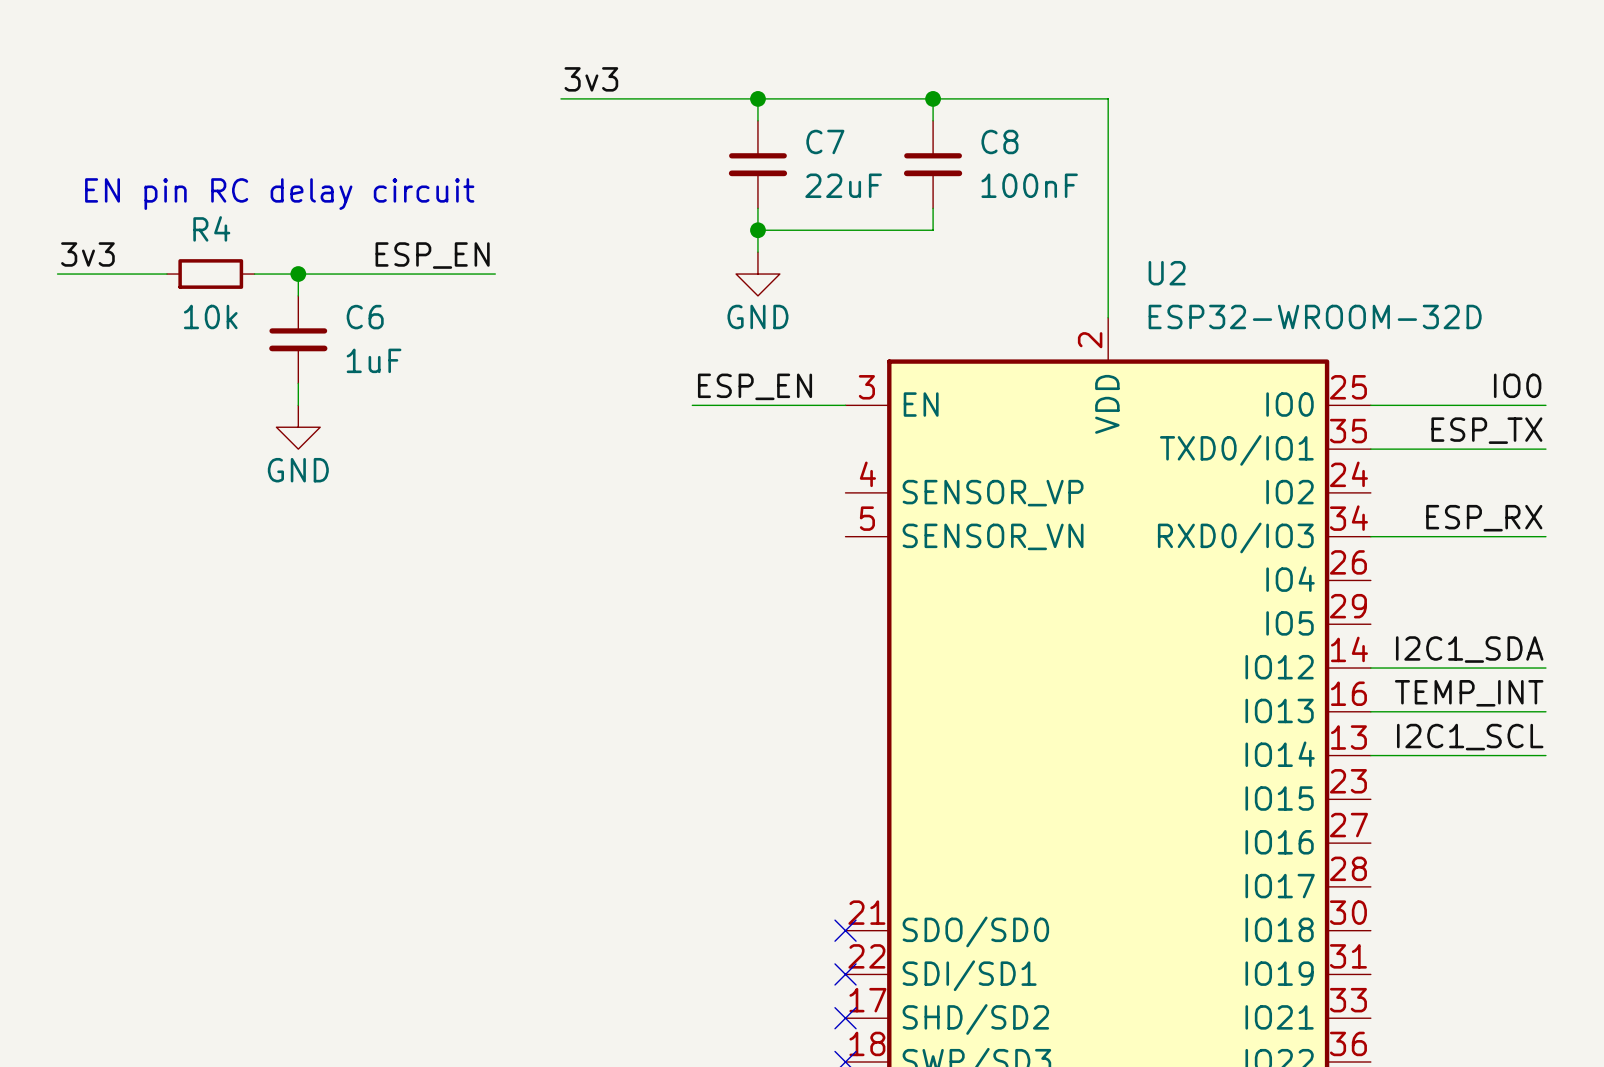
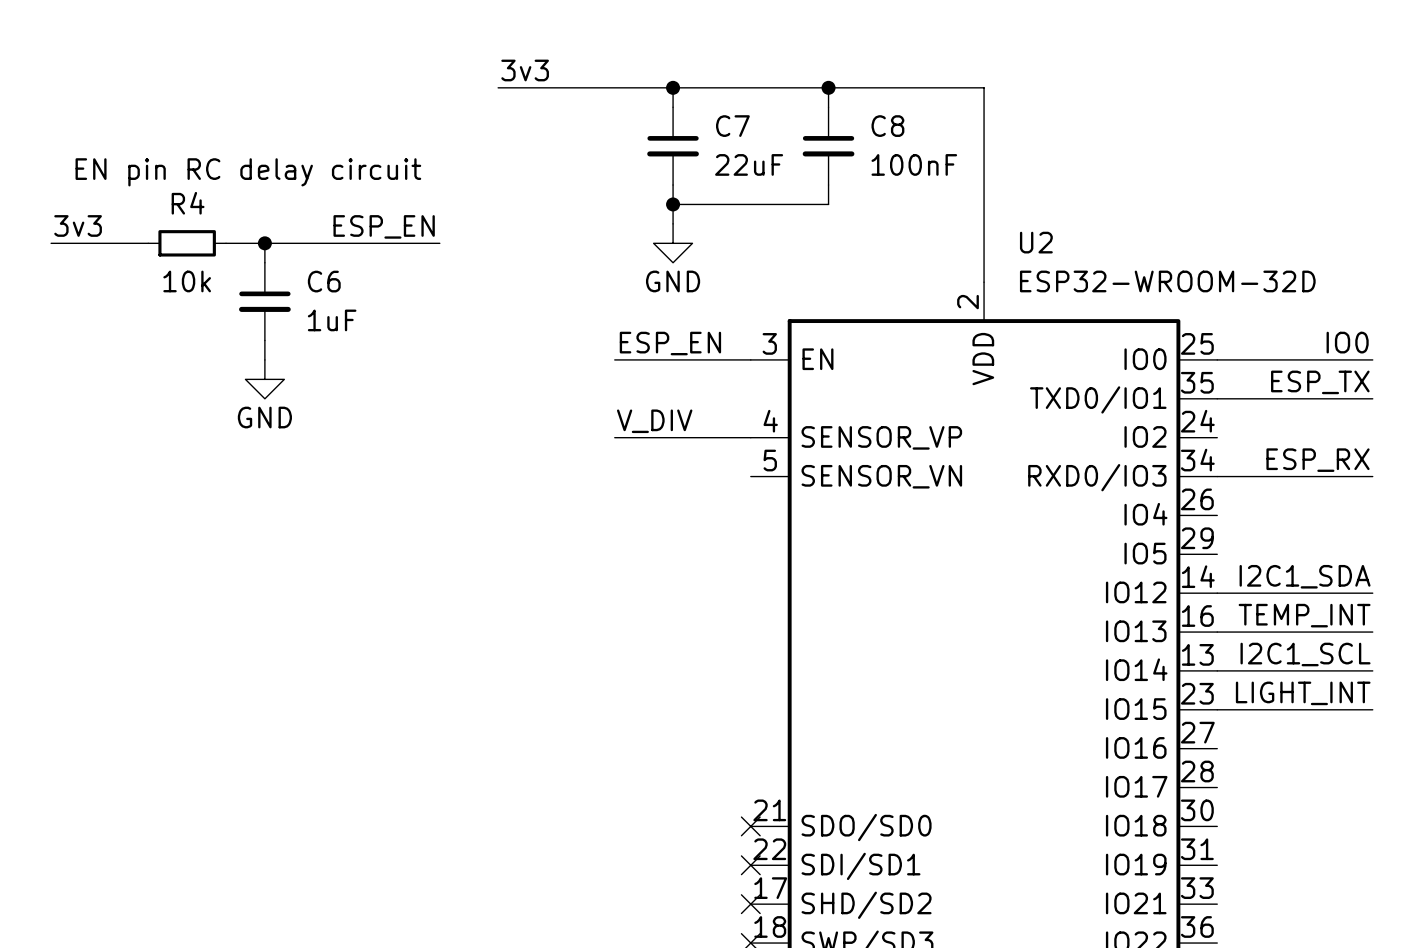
label: none -> V_DIV (654, 421)
wire: none -> (614, 437) (750, 437)
label: none -> LIGHT_INT (1303, 693)
wire: none -> (1217, 709) (1372, 709)

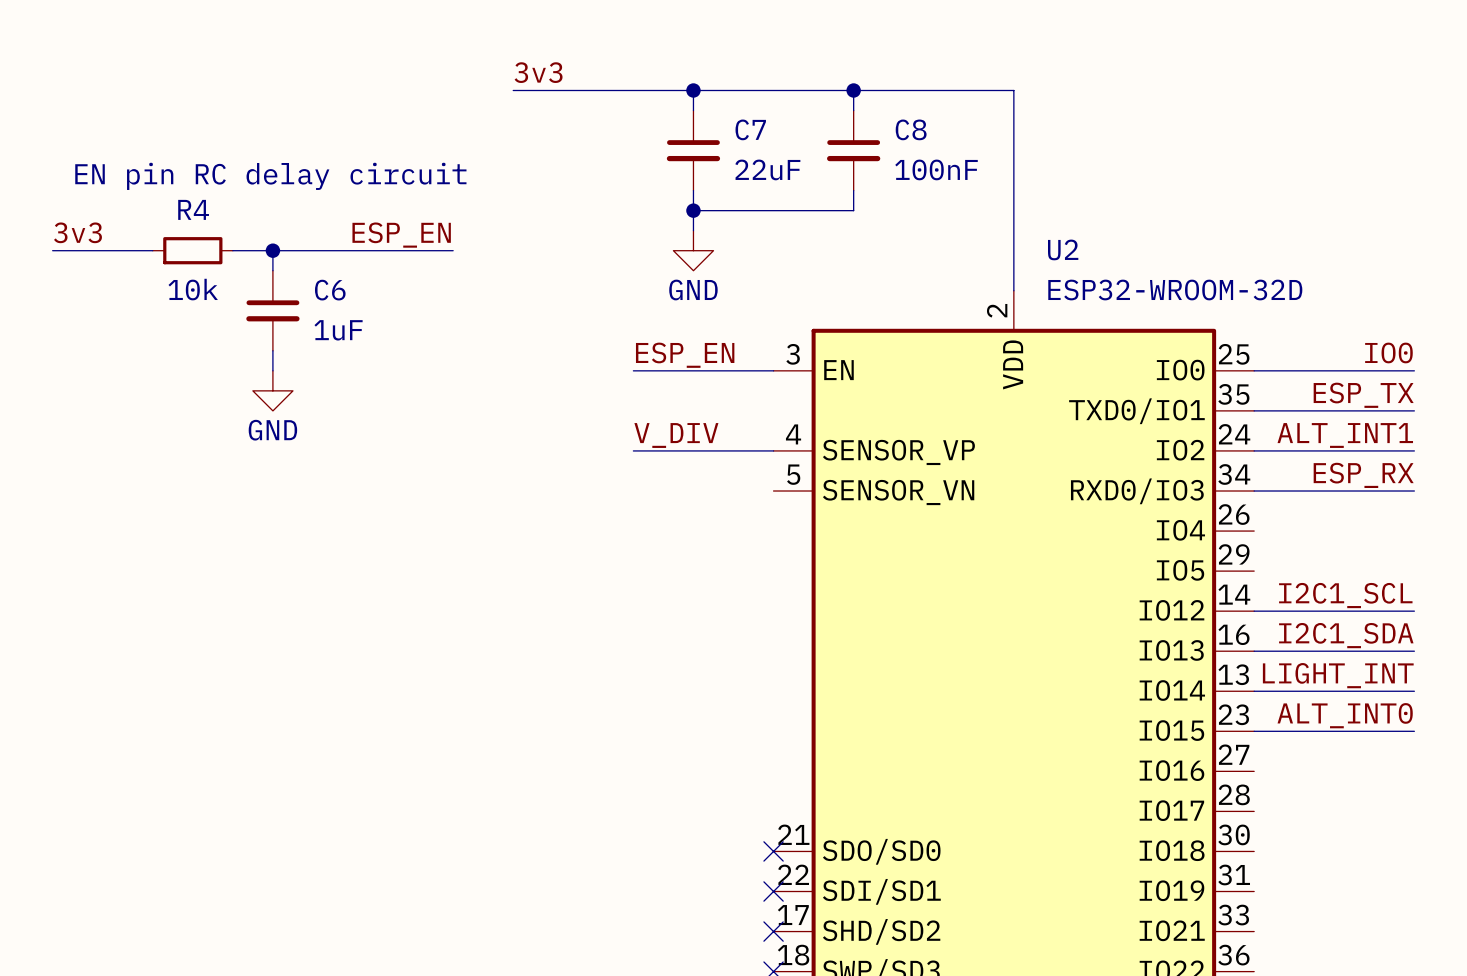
label: none -> ALT_INT1 (1345, 435)
wire: none -> (1254, 450) (1414, 450)
label: I2C1_SDA (1305, 576) -> I2C1_SCL (1345, 595)
label: TEMP_INT (1304, 615) -> I2C1_SDA (1346, 635)
label: I2C1_SCL (1305, 654) -> LIGHT_INT (1338, 675)
label: LIGHT_INT (1303, 693) -> ALT_INT0 (1345, 715)

